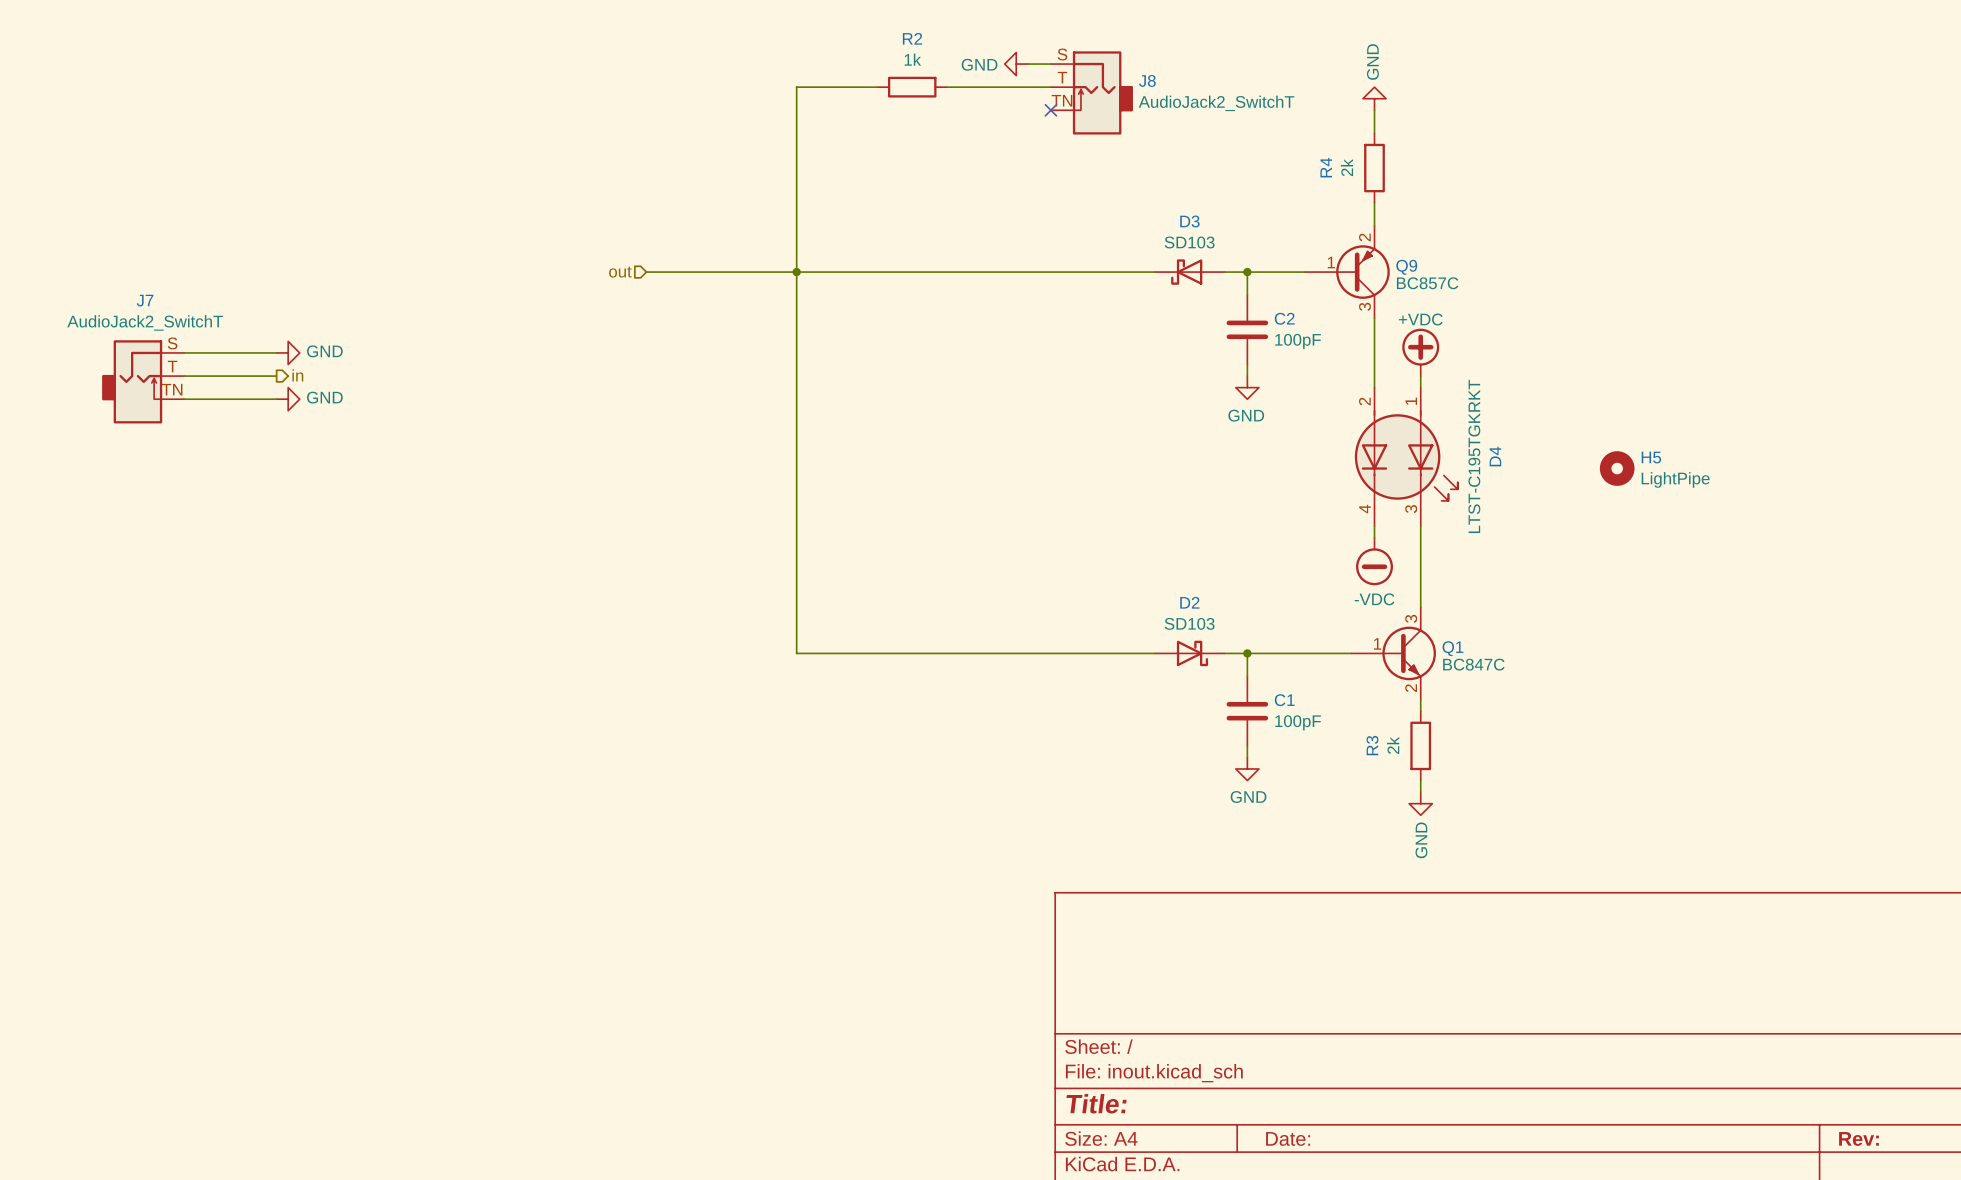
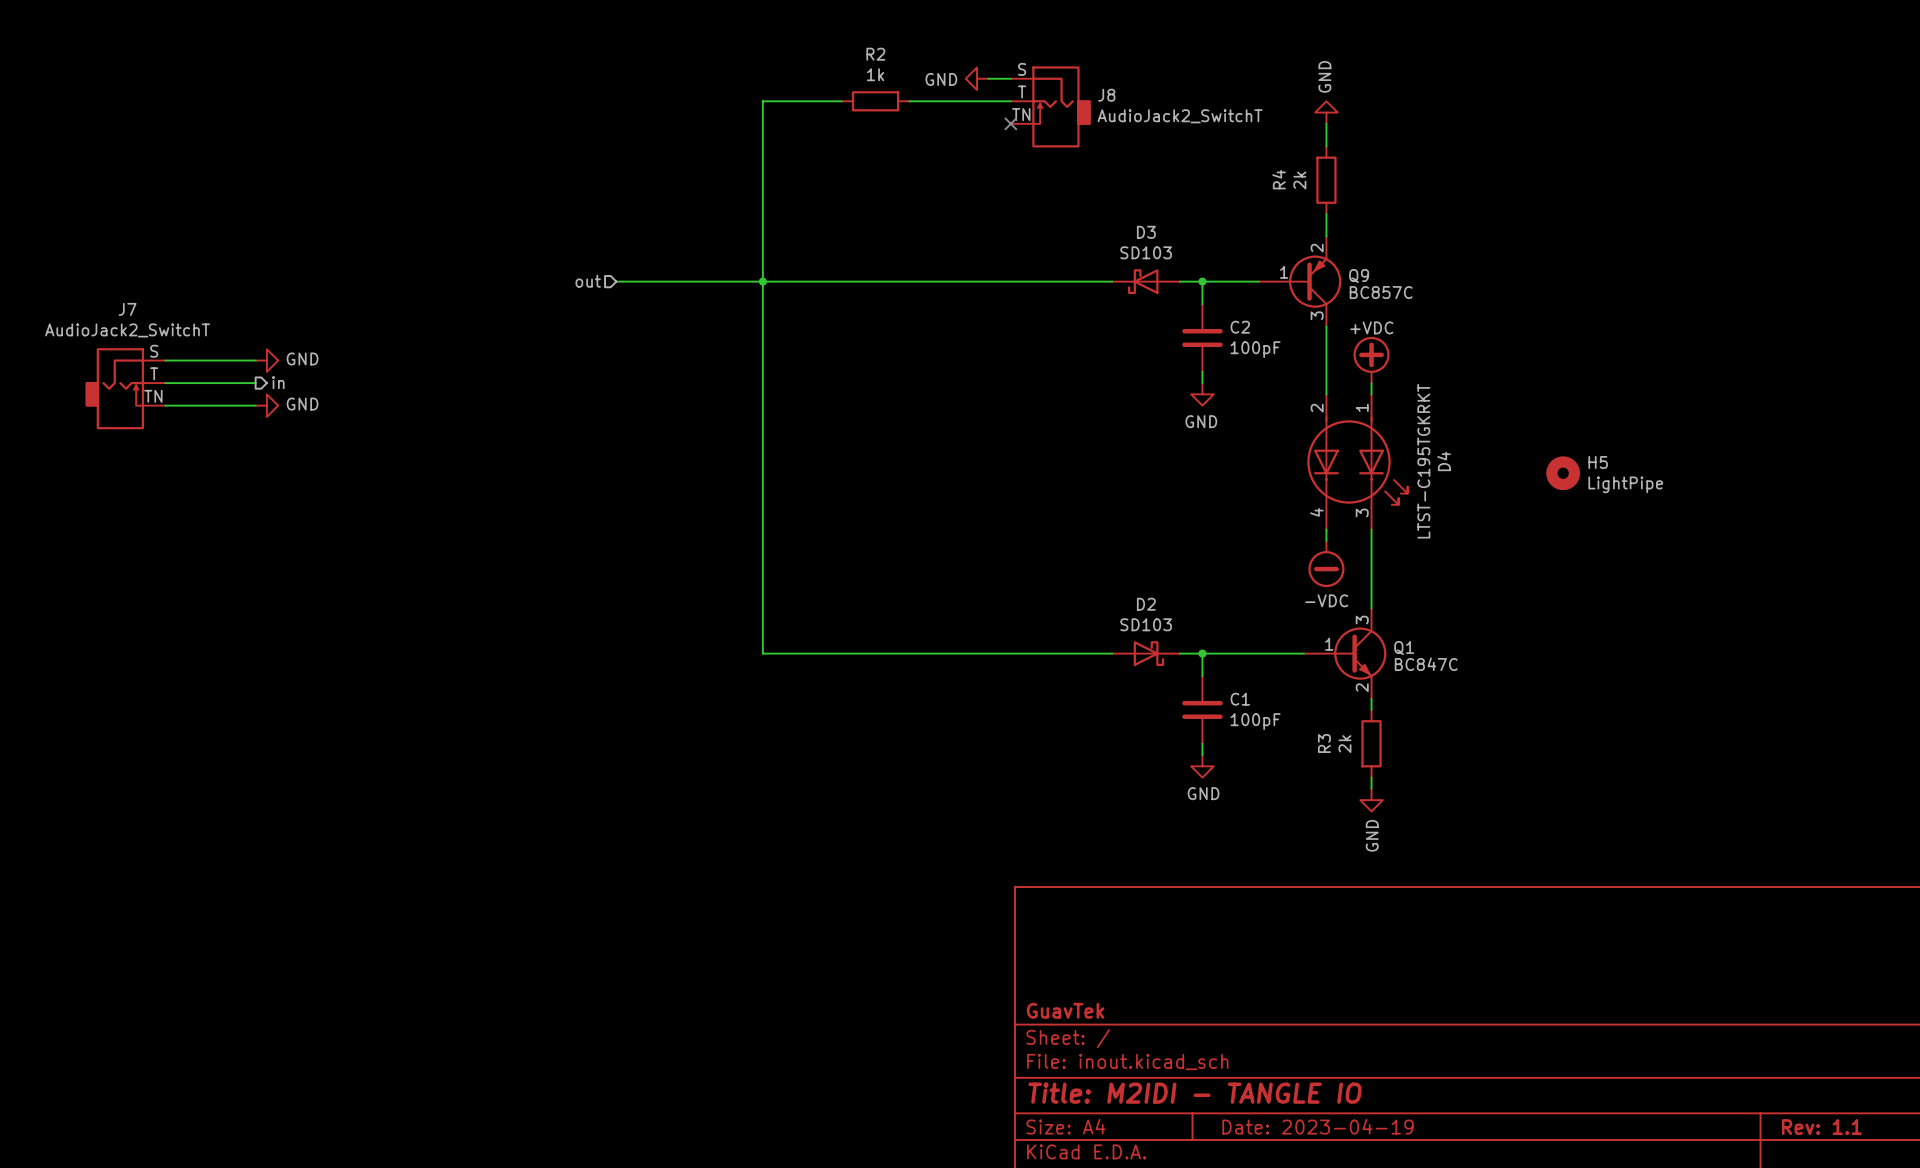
title block: none -> GuavTek (1065, 1010)
title block: Title: (1096, 1103) -> Title: M2IDI - TANGLE IO (1195, 1093)
title block: Date: (1288, 1138) -> Date: 2023-04-19 (1317, 1126)
title block: Rev: (1858, 1138) -> Rev: 1.1 (1821, 1127)

